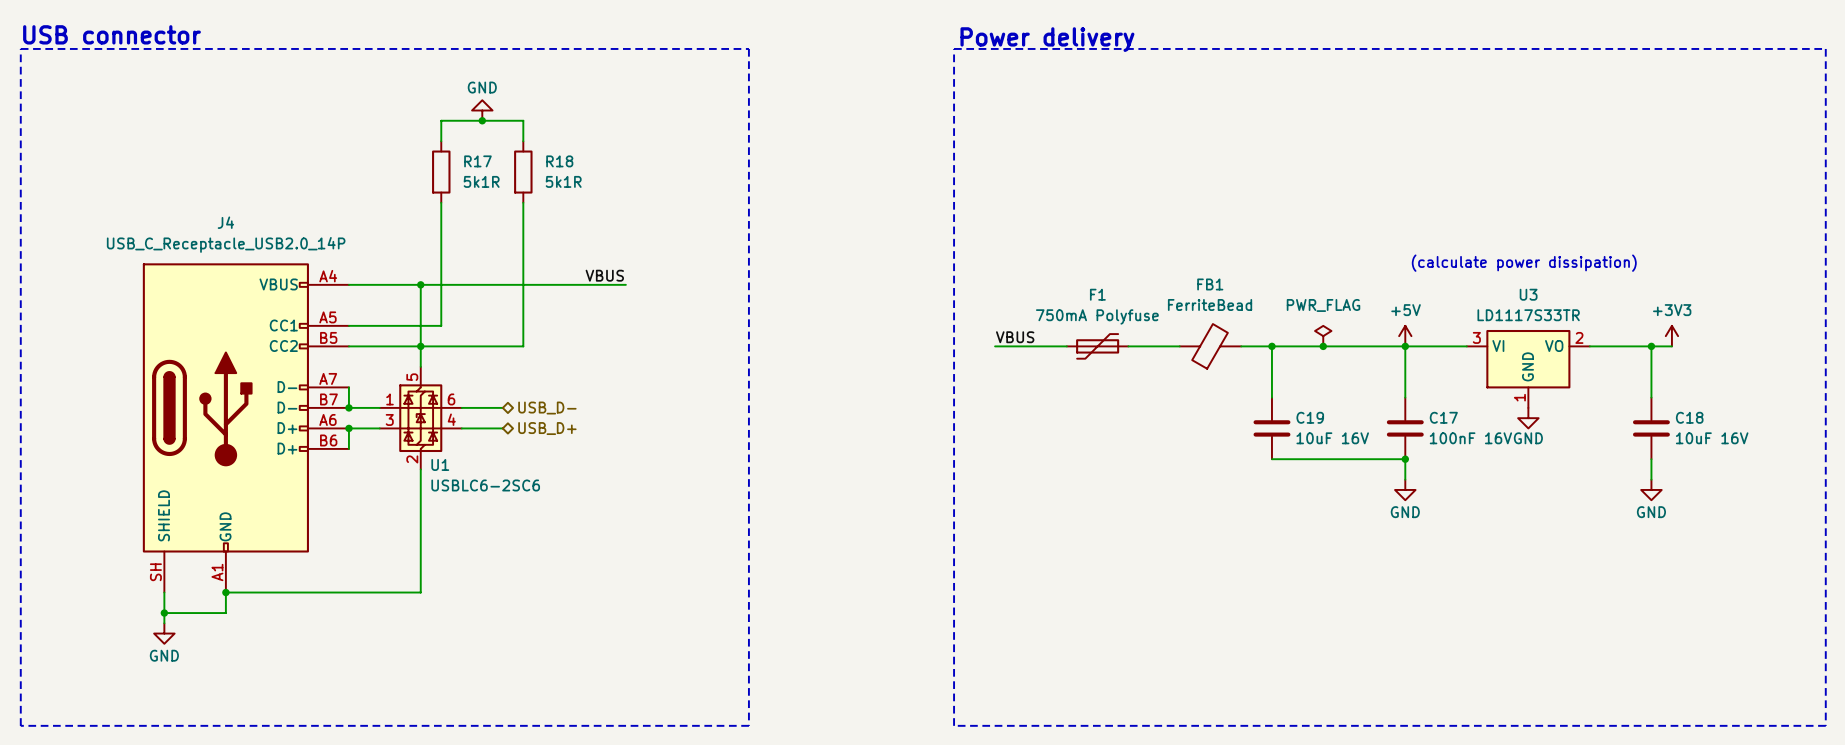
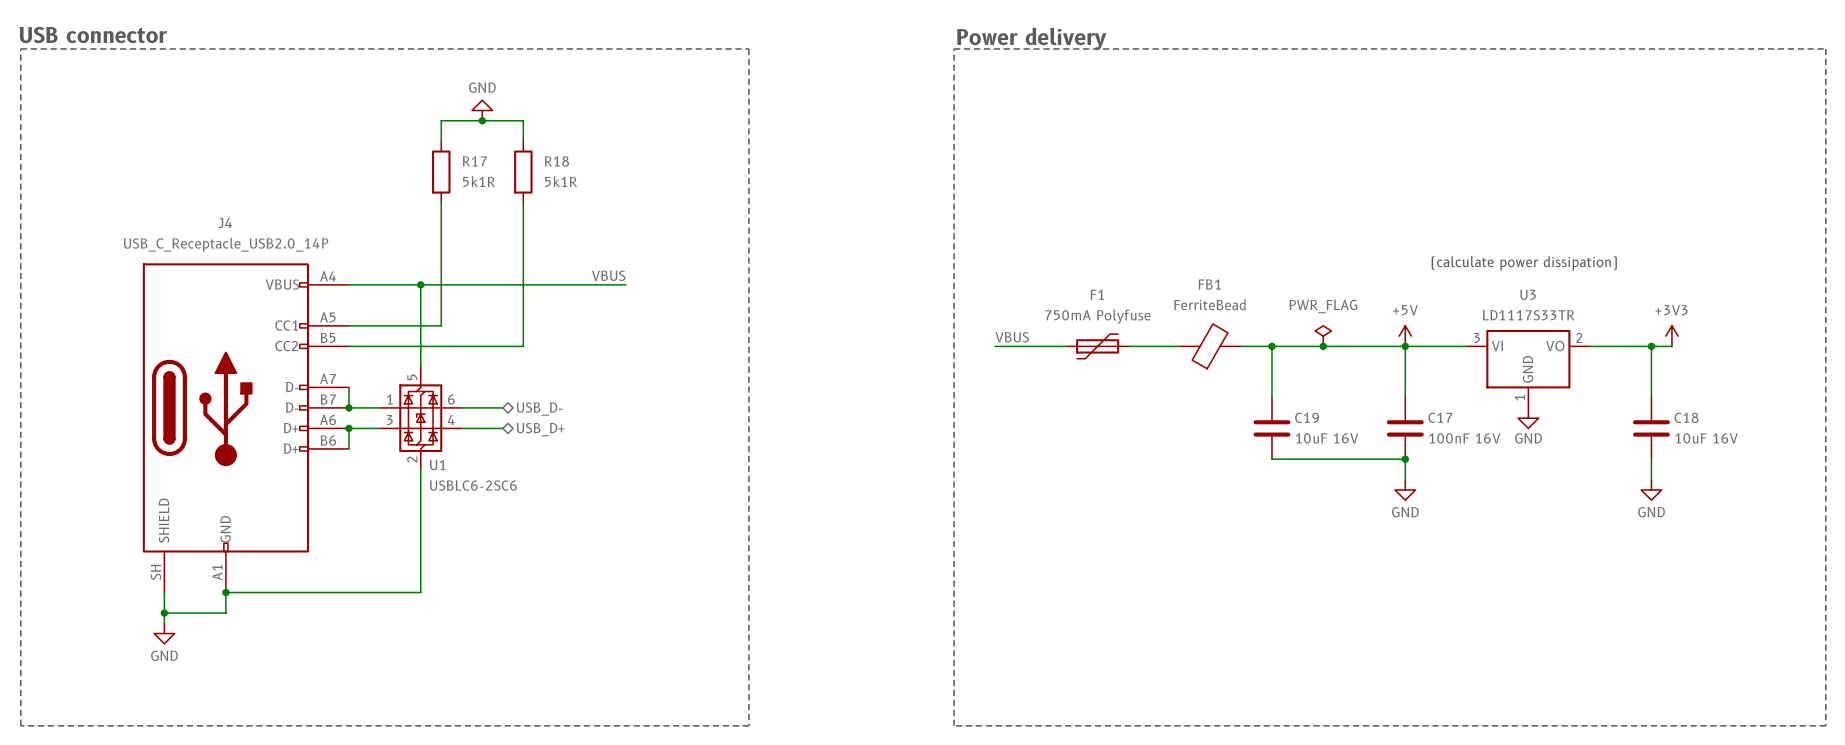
junction: (420, 346) -> none

